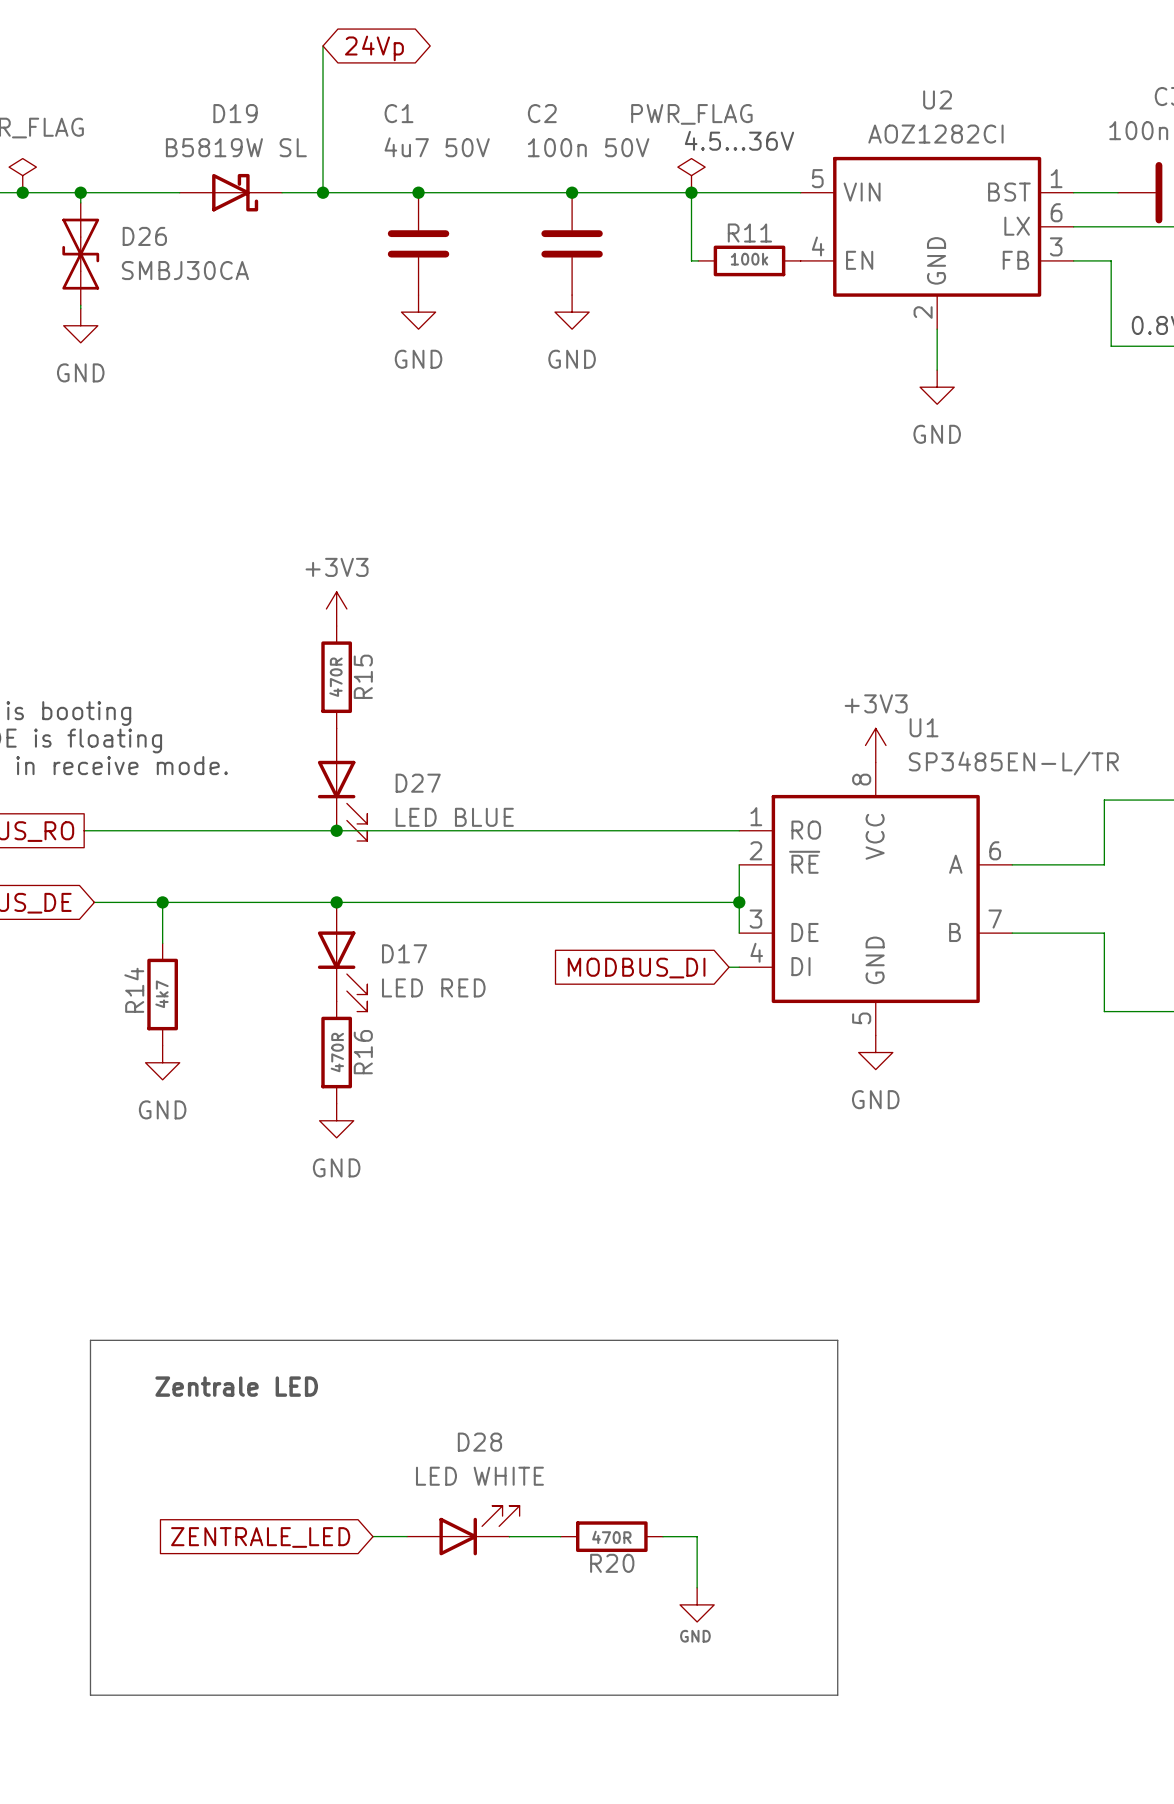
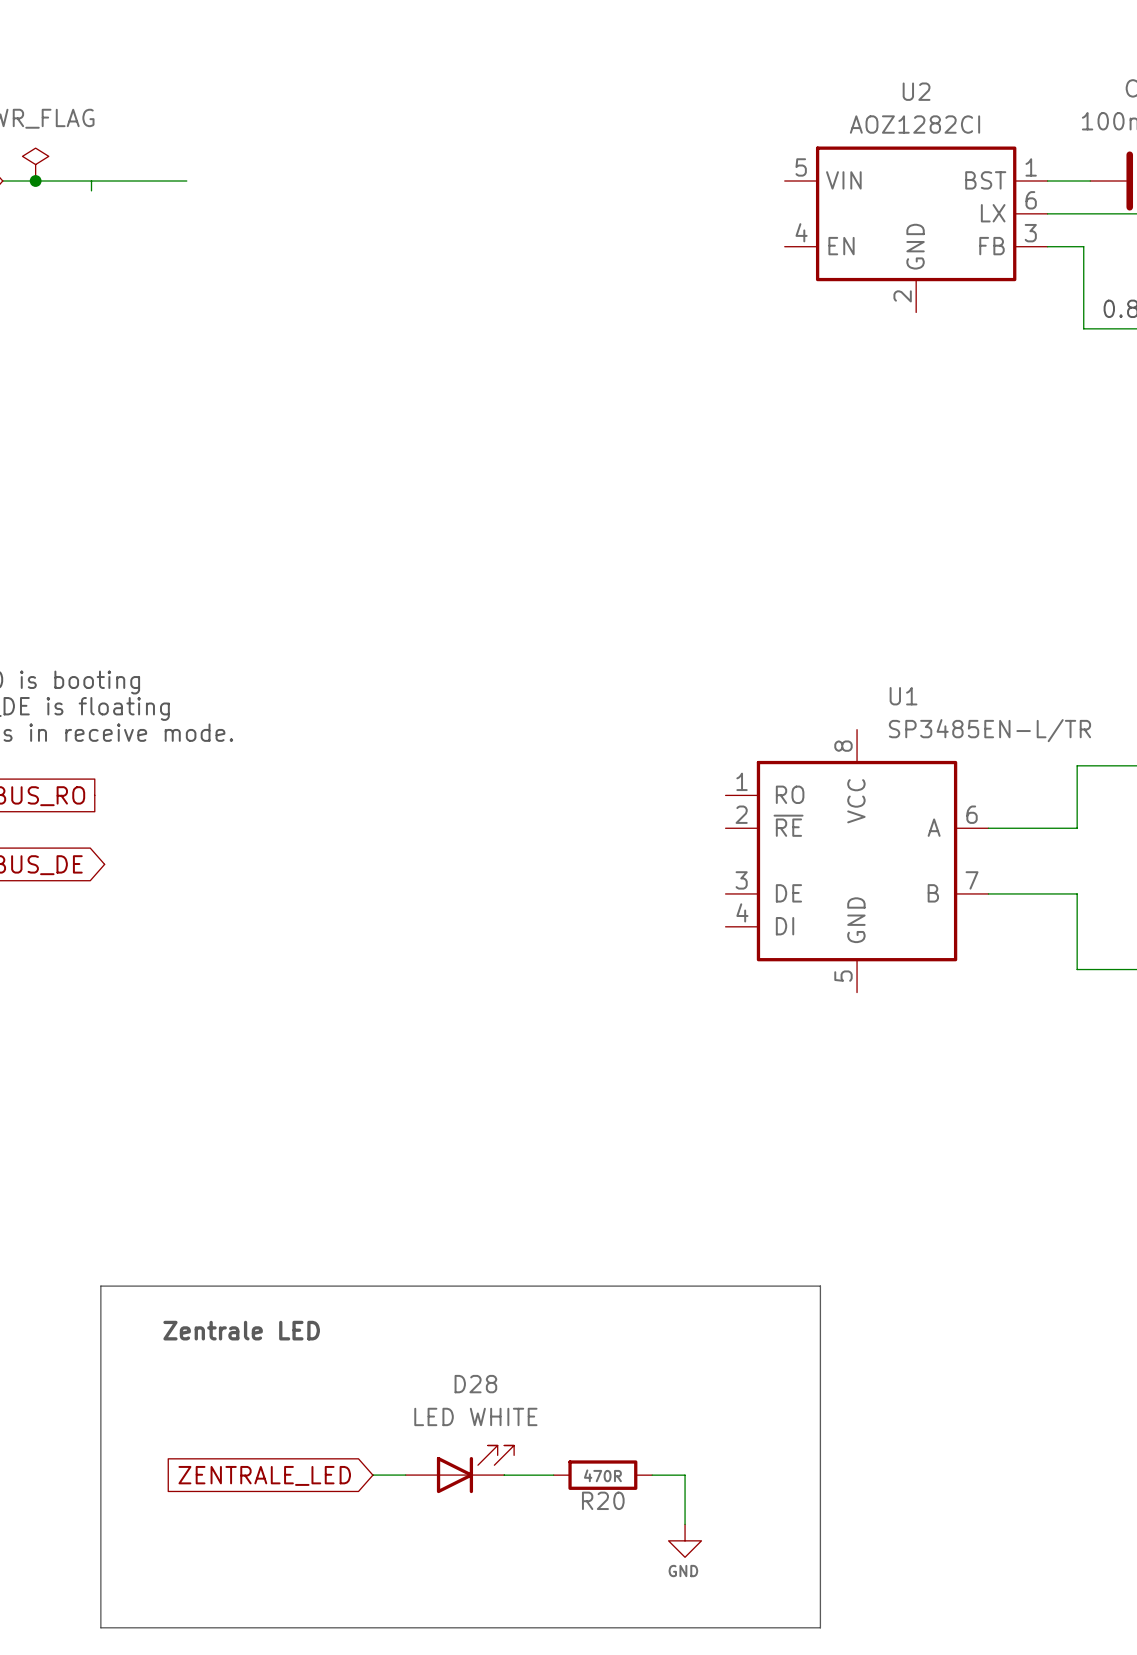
wire: (323, 45) (323, 192) -> none
global label: 24Vp (374, 48) -> none
text: 4.5...36V (739, 140) -> none
power symbol: PWR_FLAG (691, 175) -> none
junction: (80, 192) -> none
D19: B5819W SL (230, 192) -> none
wire: (282, 192) (800, 192) -> none
junction: (323, 192) -> none
junction: (418, 192) -> none
junction: (572, 192) -> none
wire: (691, 192) (691, 260) (698, 260) -> none
junction: (691, 192) -> none
C1: 4u7 50V (418, 243) -> none
C2: 100n 50V (572, 243) -> none
D26: SMBJ30CA (80, 254) -> none
R11: 100k (749, 260) -> none
wire: (80, 305) (80, 308) -> none
power symbol: GND (418, 312) -> none
power symbol: GND (572, 312) -> none
power symbol: GND (80, 325) -> none
wire: (937, 329) (937, 370) -> none
power symbol: GND (937, 387) -> none
power symbol: +3V3 (336, 608) -> none
R15: 470R (336, 677) -> none
power symbol: +3V3 (875, 745) -> none
D27: LED BLUE (342, 784) -> none
wire: (84, 830) (739, 830) -> none
junction: (336, 830) -> none
wire: (739, 864) (739, 933) -> none
wire: (94, 902) (739, 902) -> none
wire: (162, 902) (162, 943) -> none
junction: (162, 902) -> none
junction: (336, 902) -> none
junction: (739, 902) -> none
D17: LED RED (342, 955) -> none
wire: (729, 967) (739, 967) -> none
global label: MODBUS_DI (636, 968) -> none
R14: 4k7 (162, 994) -> none
R16: 470R (336, 1052) -> none
power symbol: GND (875, 1052) -> none
power symbol: GND (162, 1062) -> none
power symbol: GND (336, 1120) -> none

